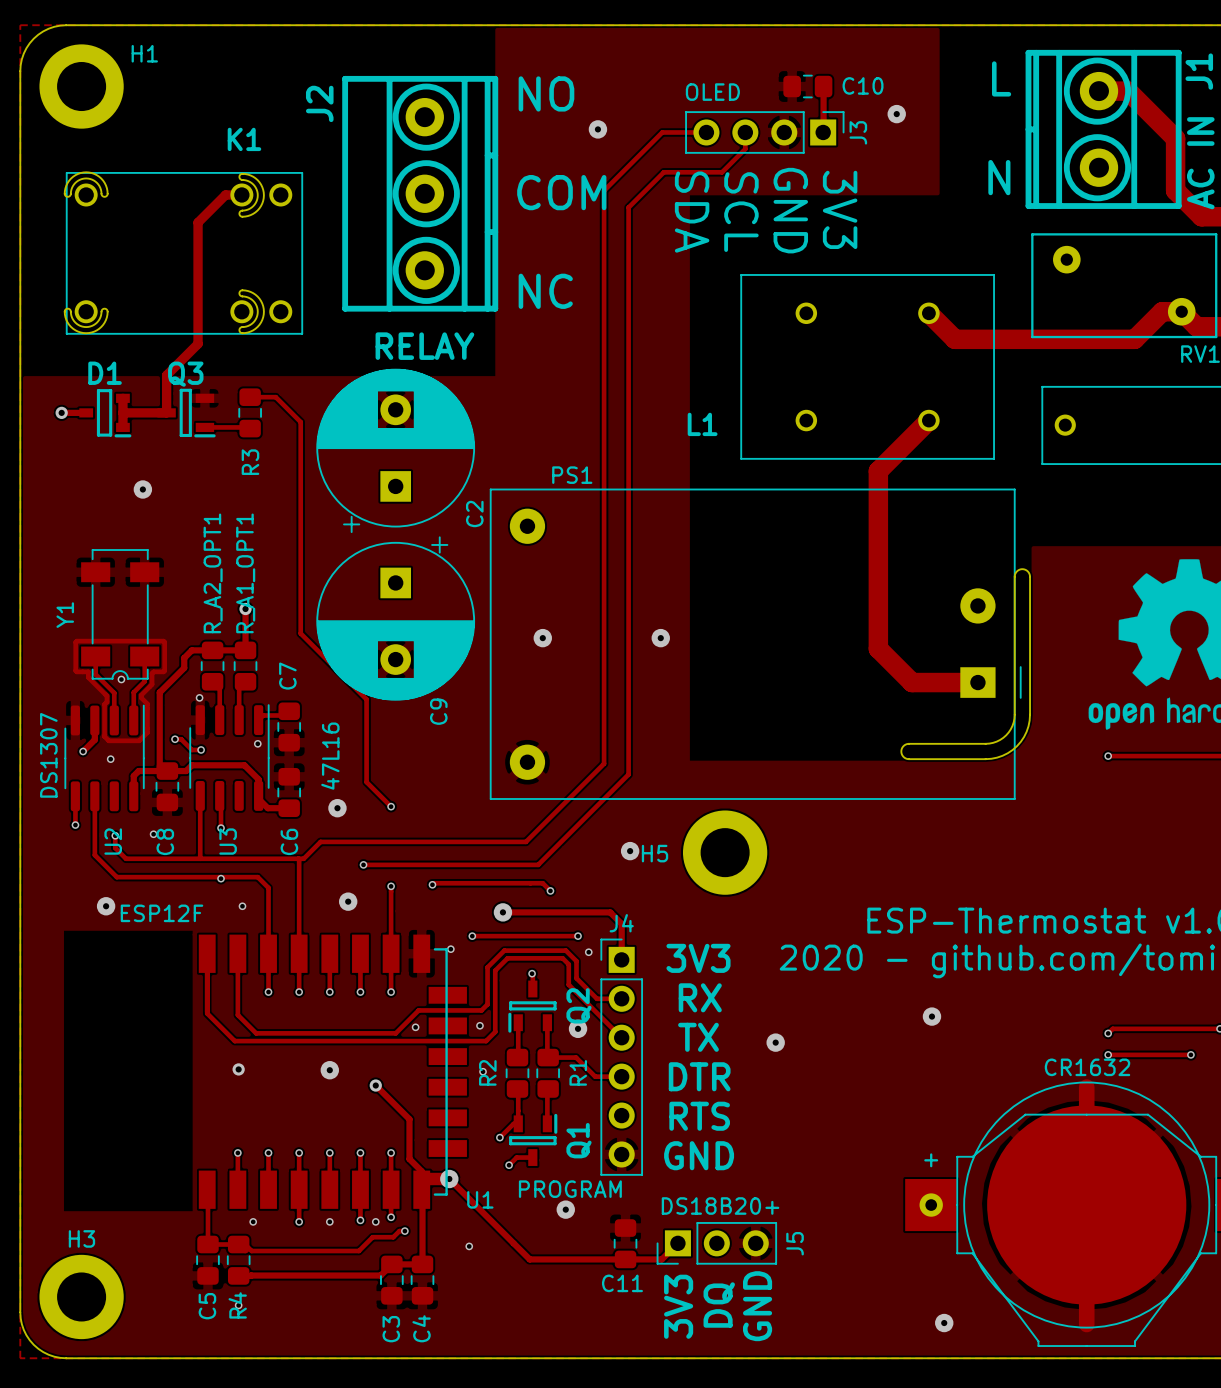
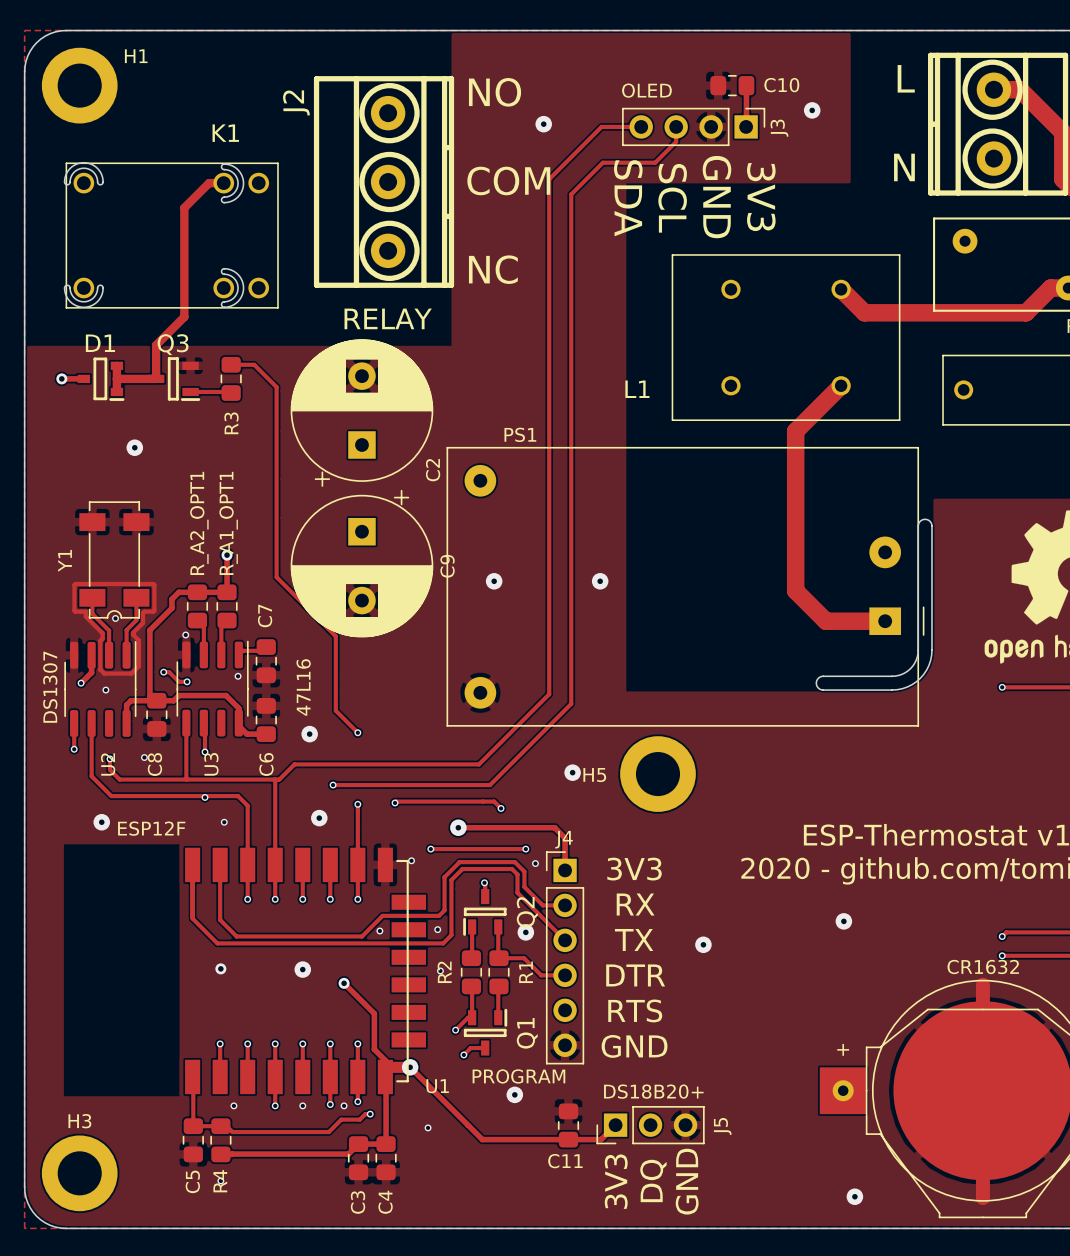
C9 name position: C9 (438, 711) -> C9 (447, 566)

